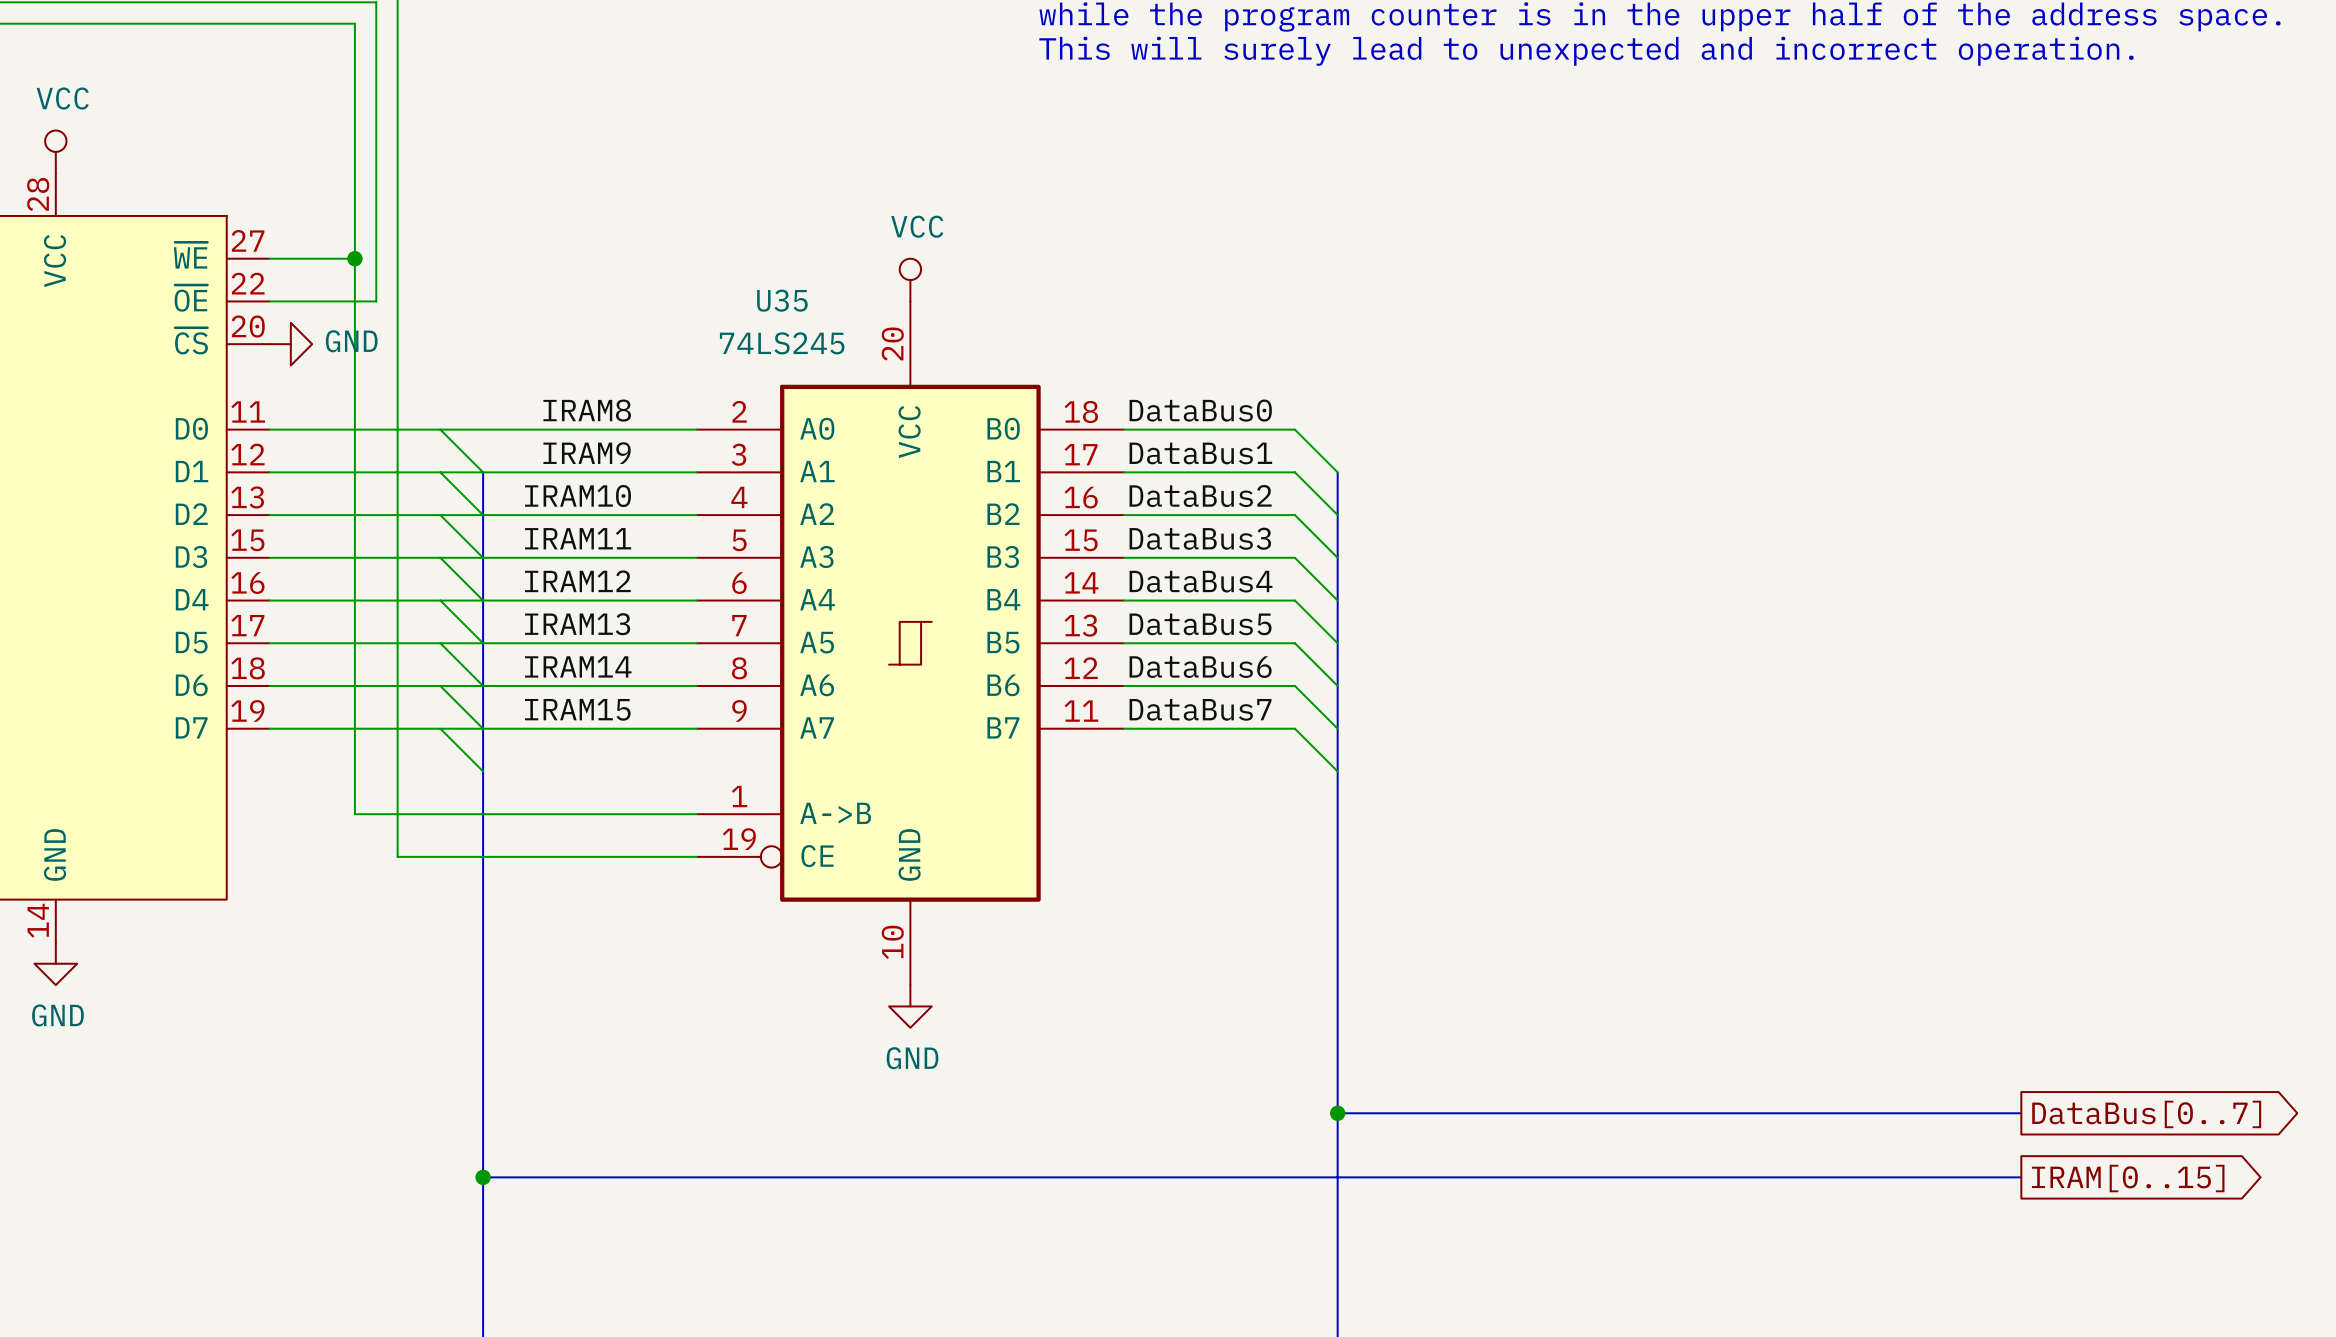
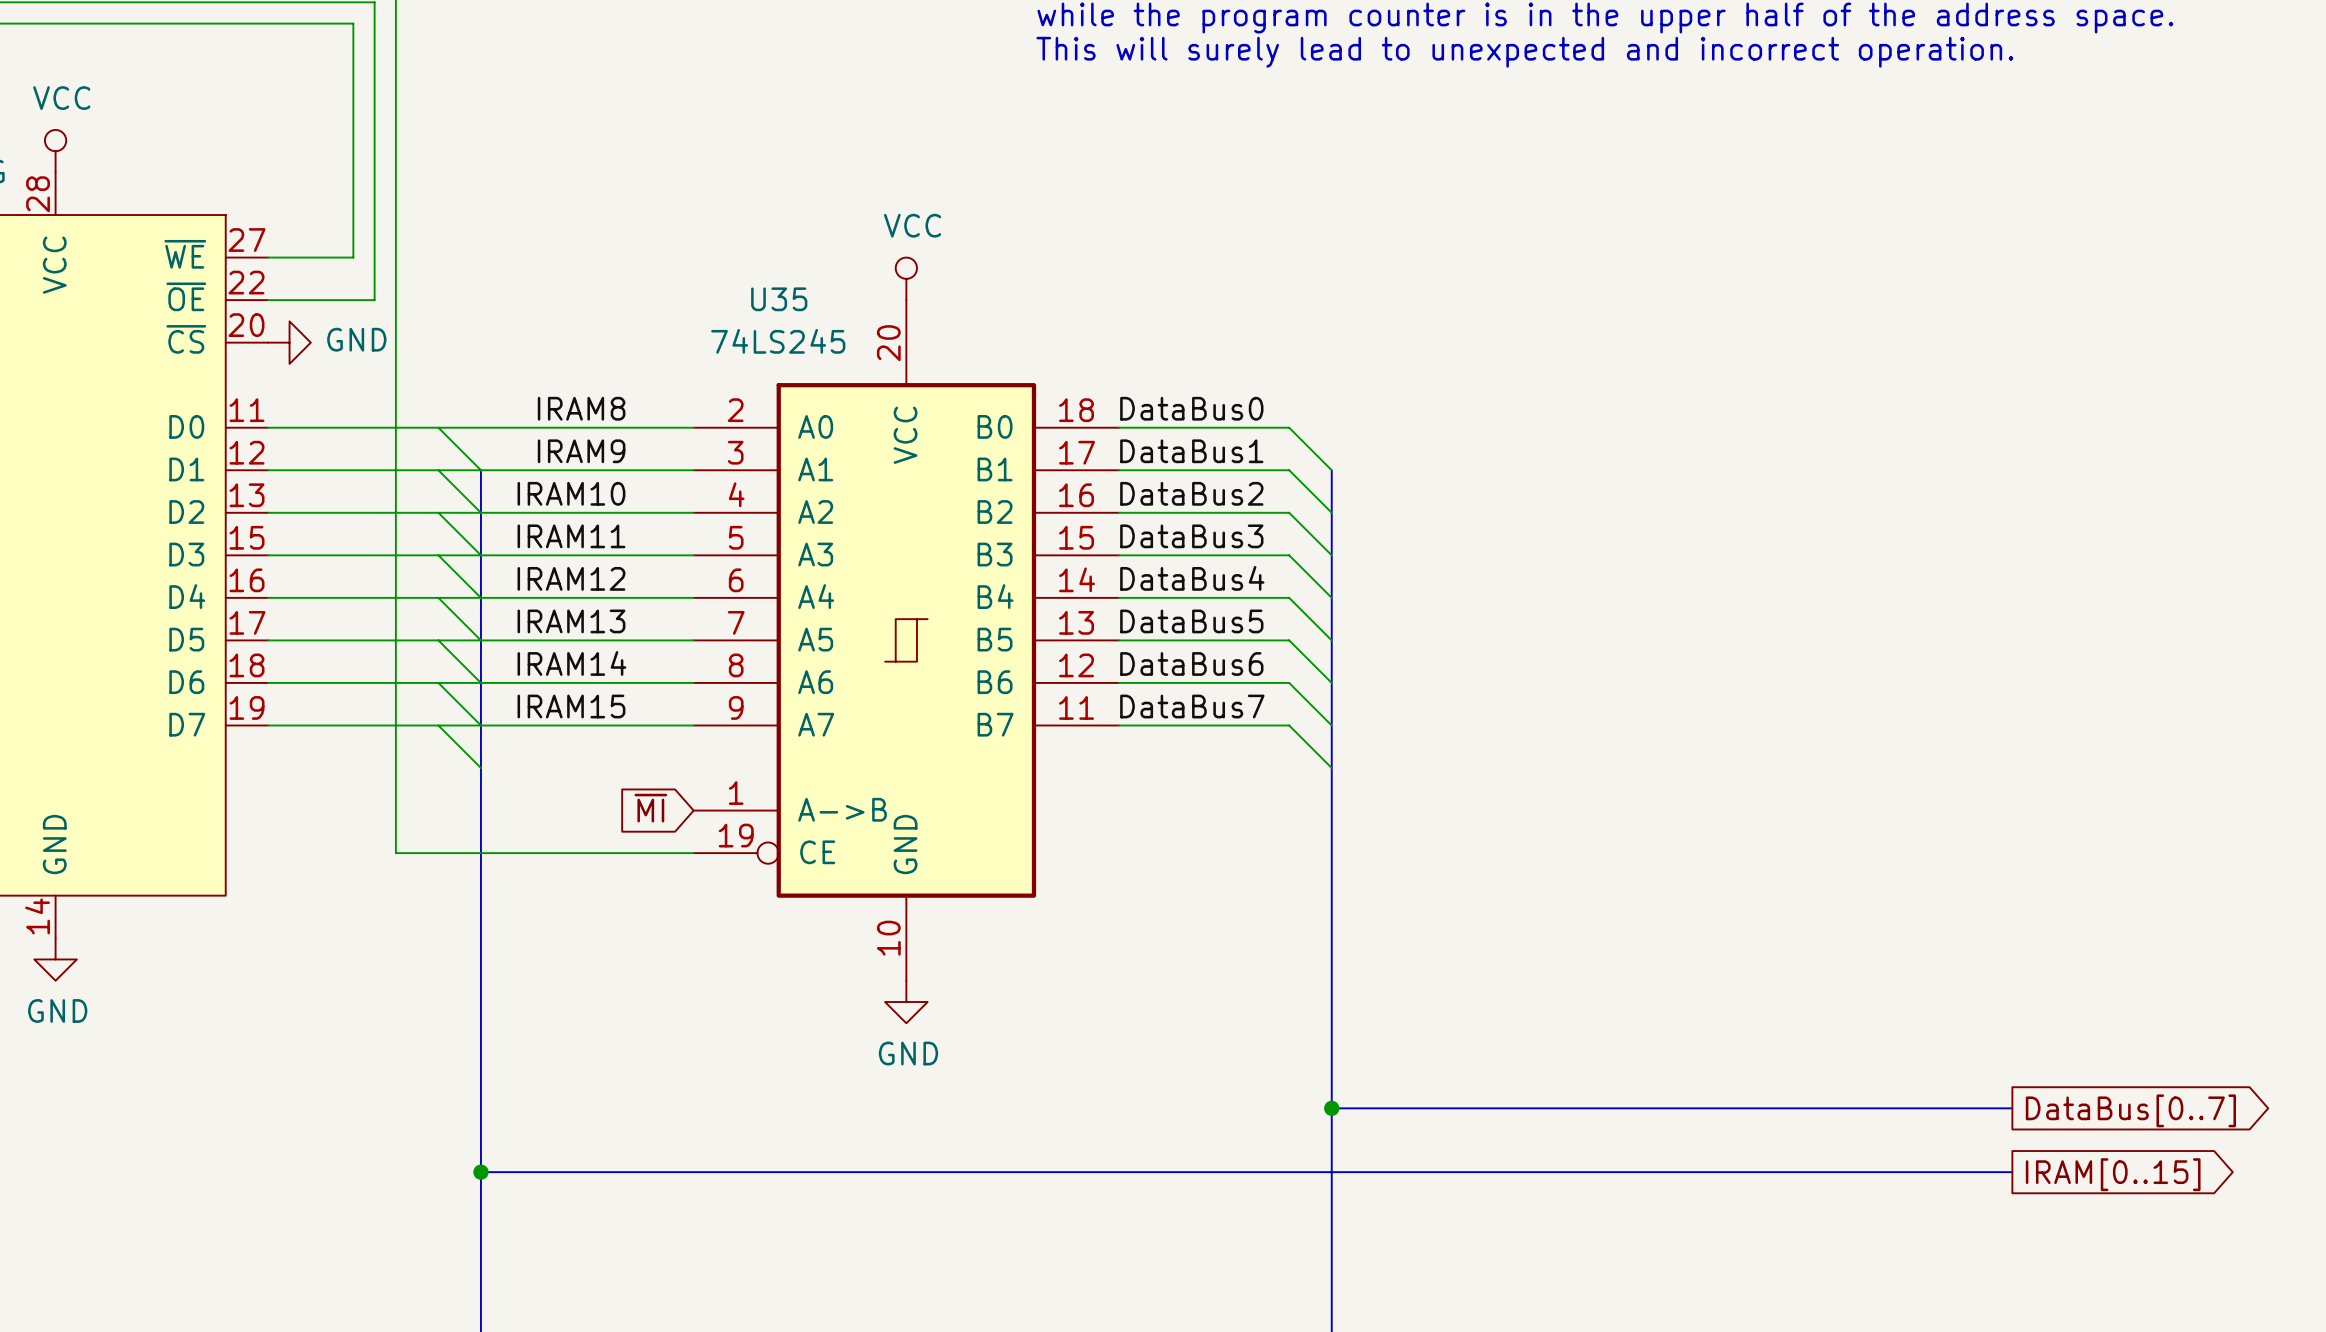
wire: (354, 258) (354, 814) (696, 814) -> none
junction: (354, 258) -> none
global label: none -> ~{MI} (650, 808)

